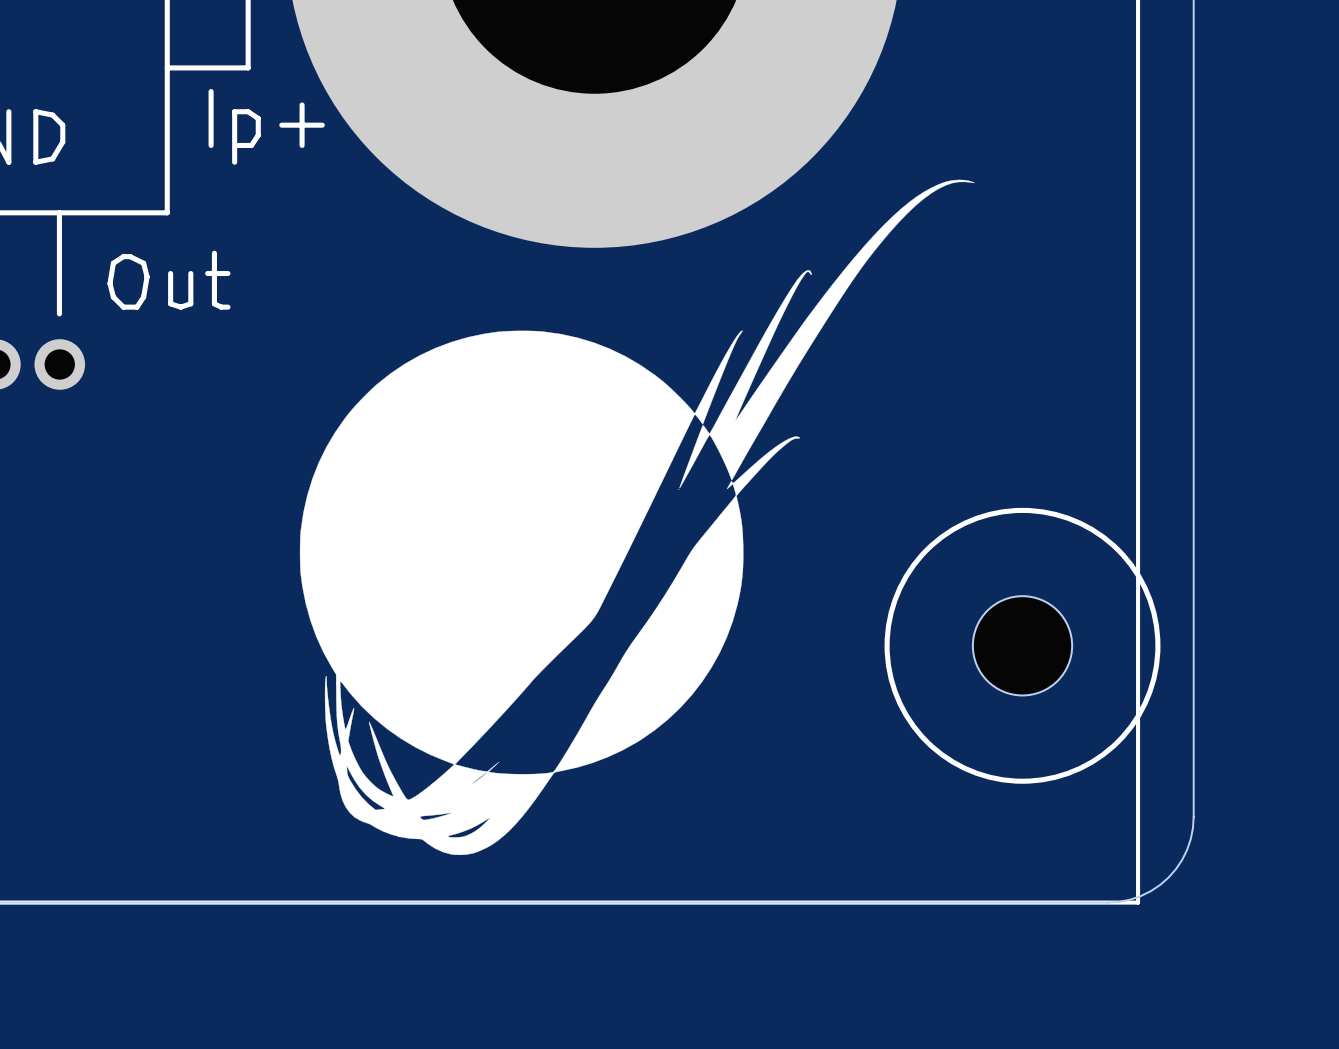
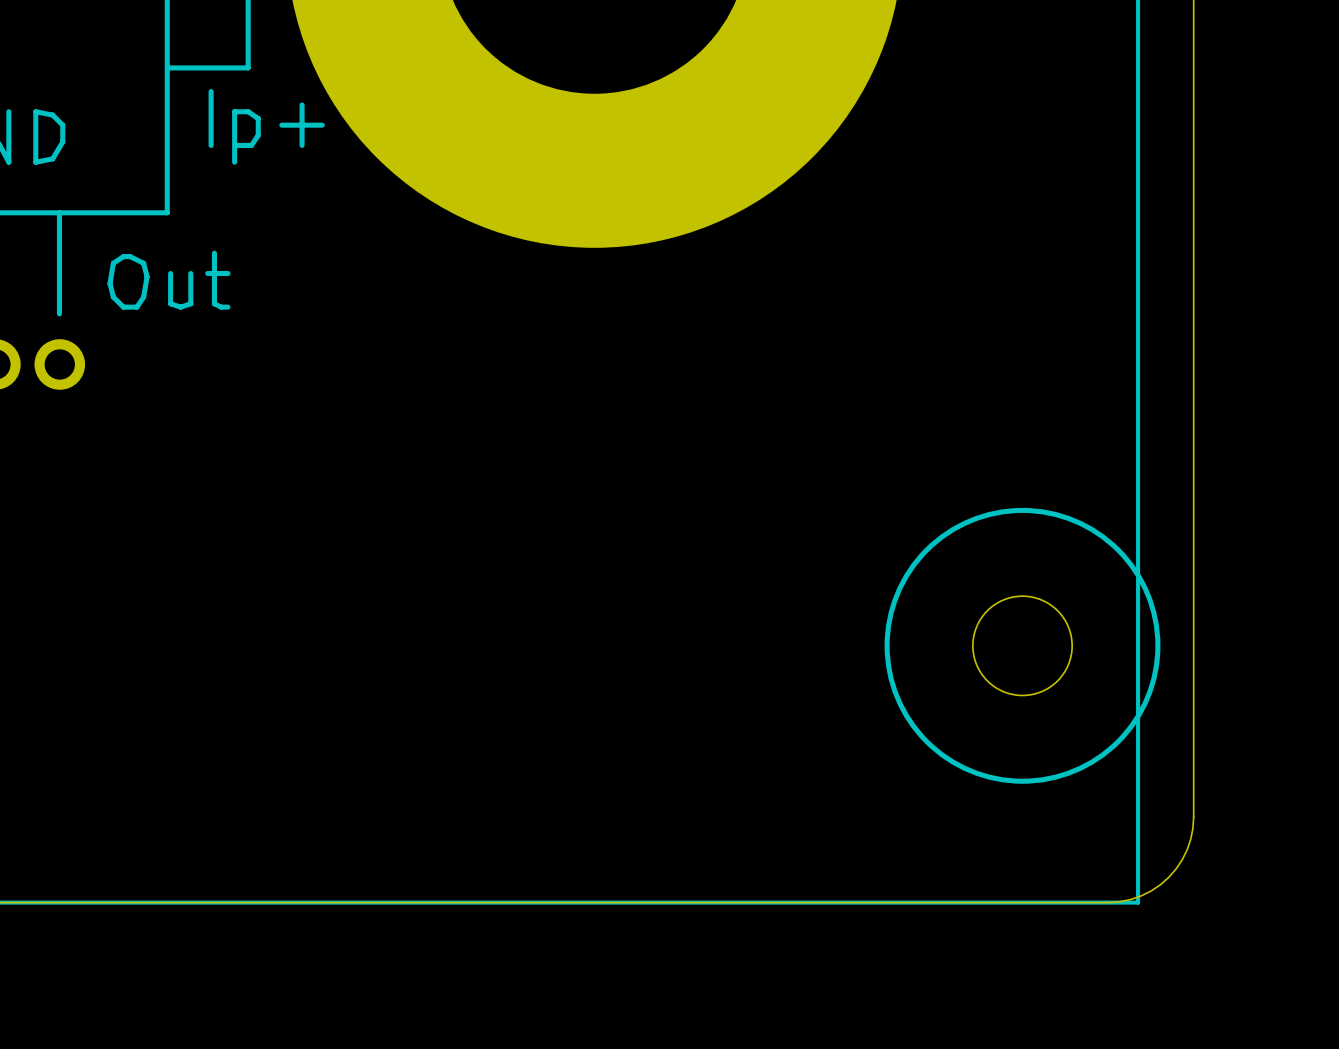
drawing: [299, 179, 975, 856] -> none

